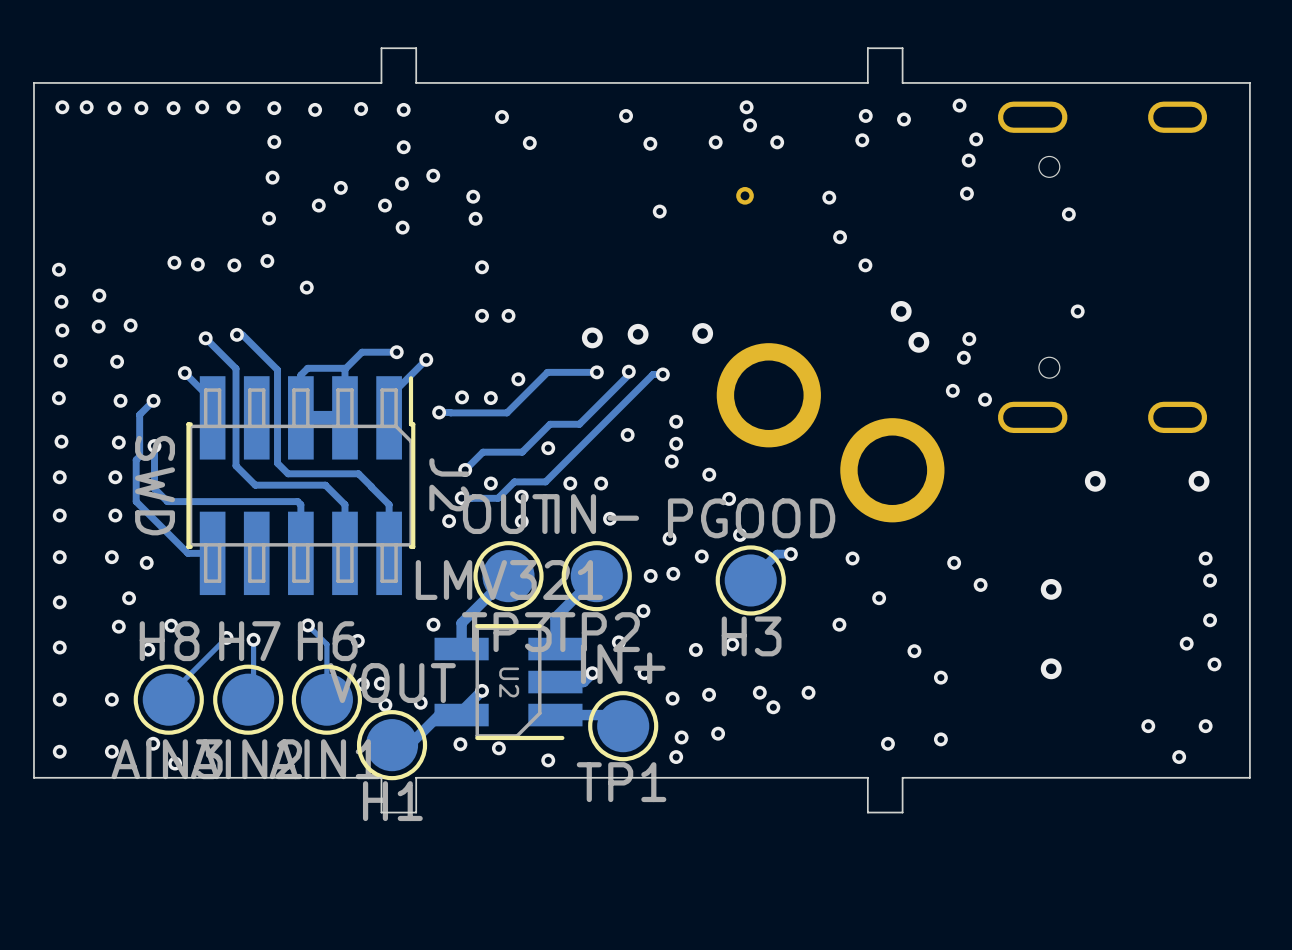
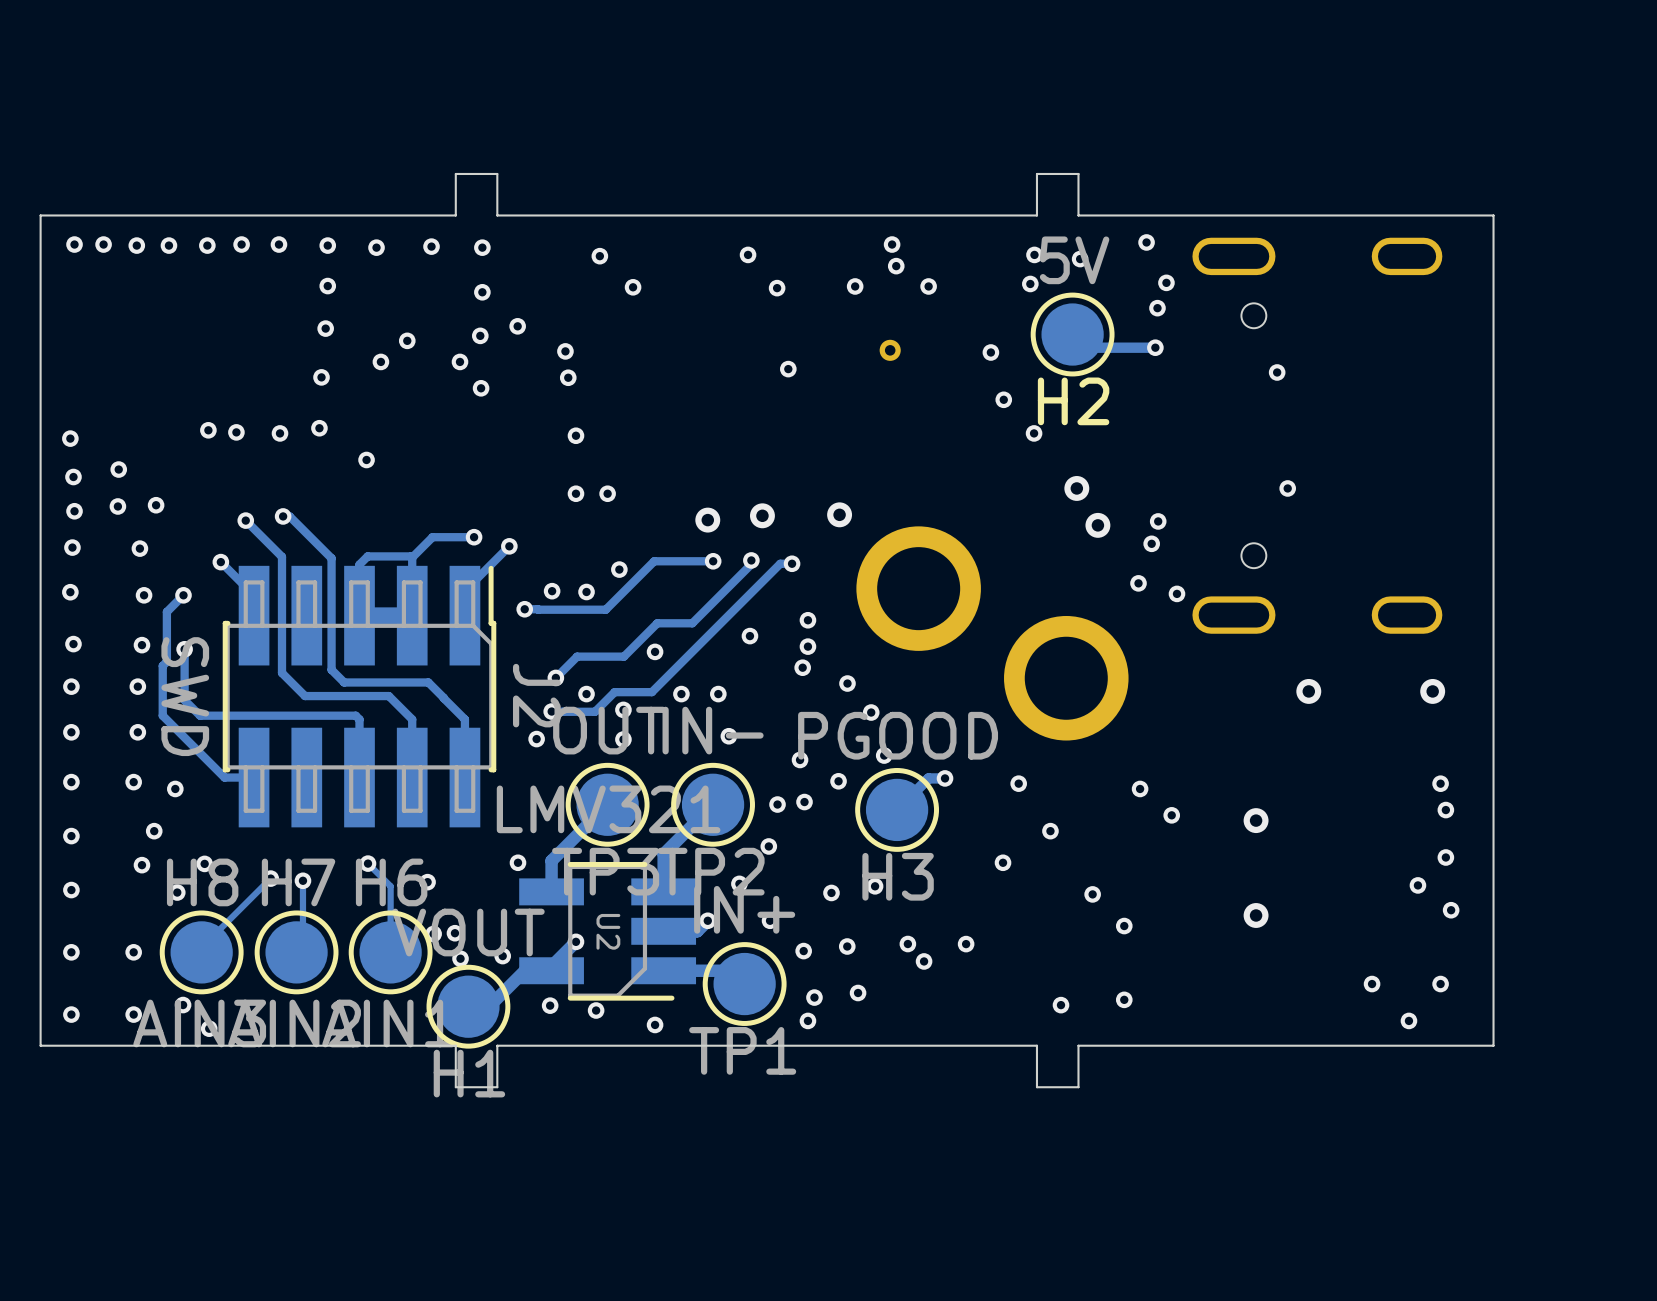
track: none -> (1072, 334) (1085, 347) (1155, 347)
H2: none -> 5V (1072, 334)

